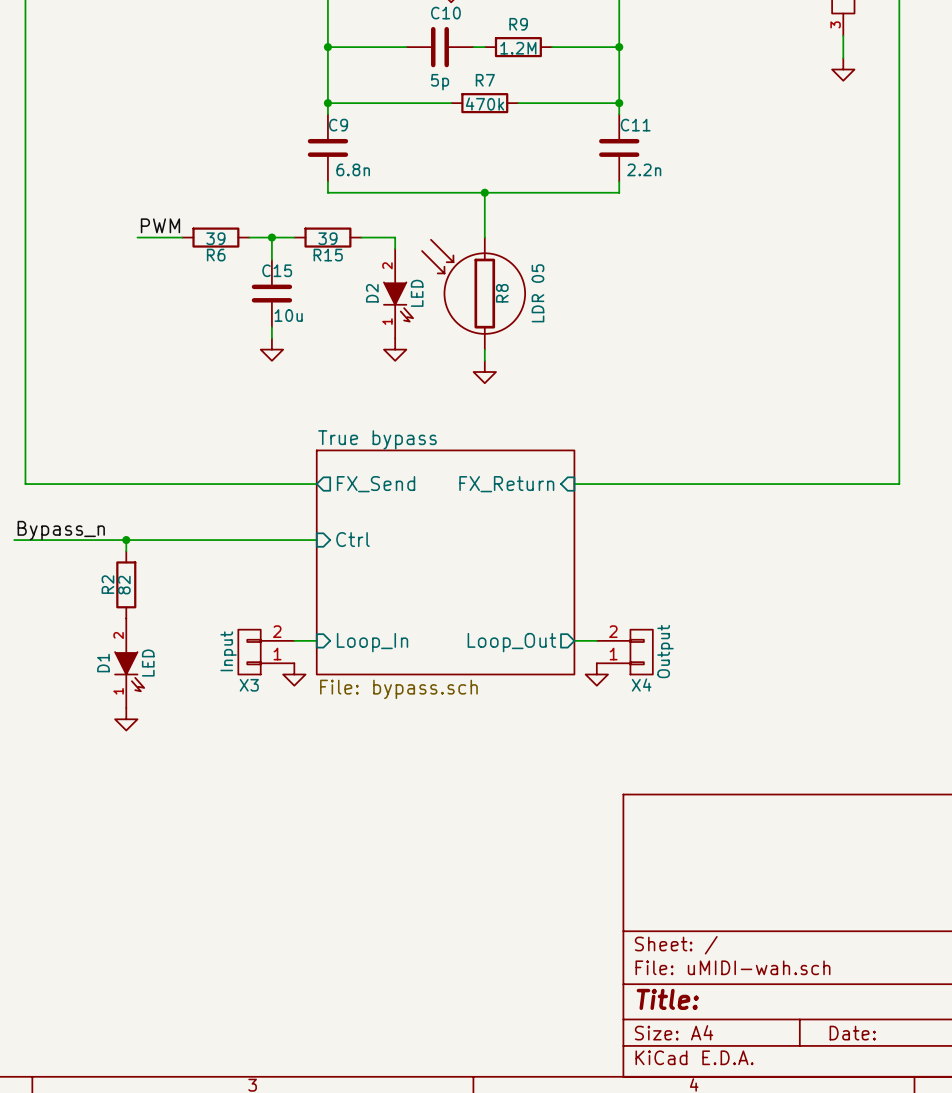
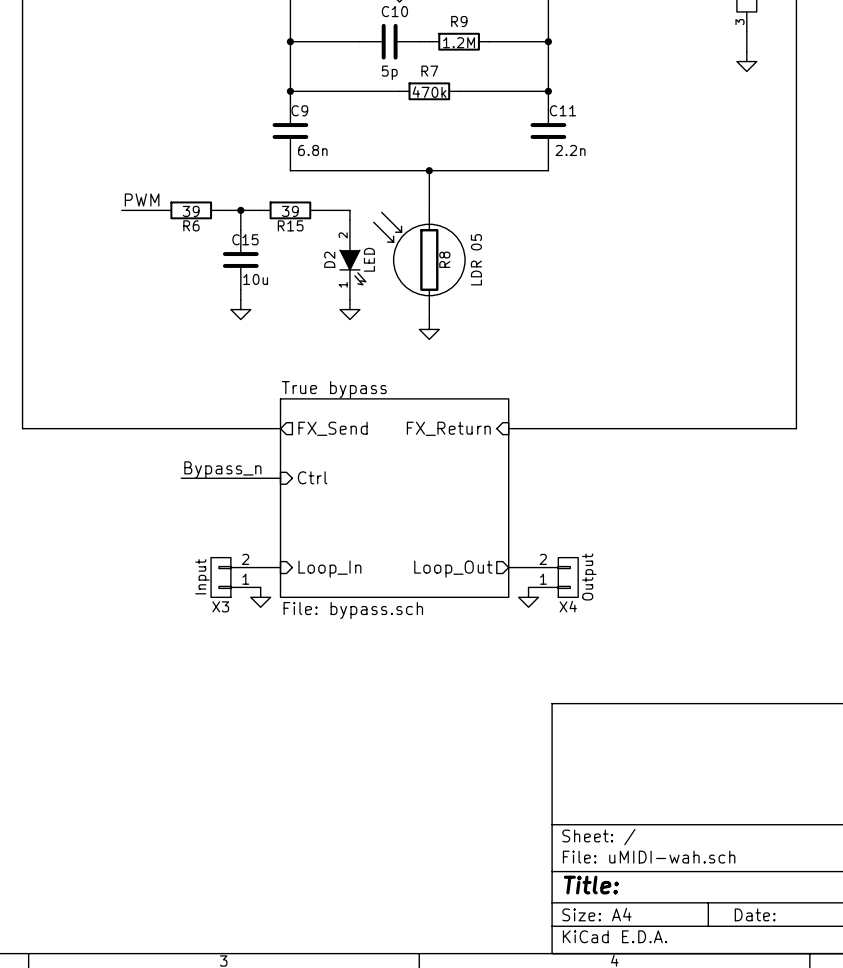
label position: Bypass_n (61, 530) -> Bypass_n (222, 469)
wire: (14, 540) (204, 540) -> none
wire: (126, 540) (126, 551) -> none
junction: (126, 540) -> none
R2: 82 (126, 584) -> none
D1: LED (129, 663) -> none
power symbol: (126, 719) -> none

